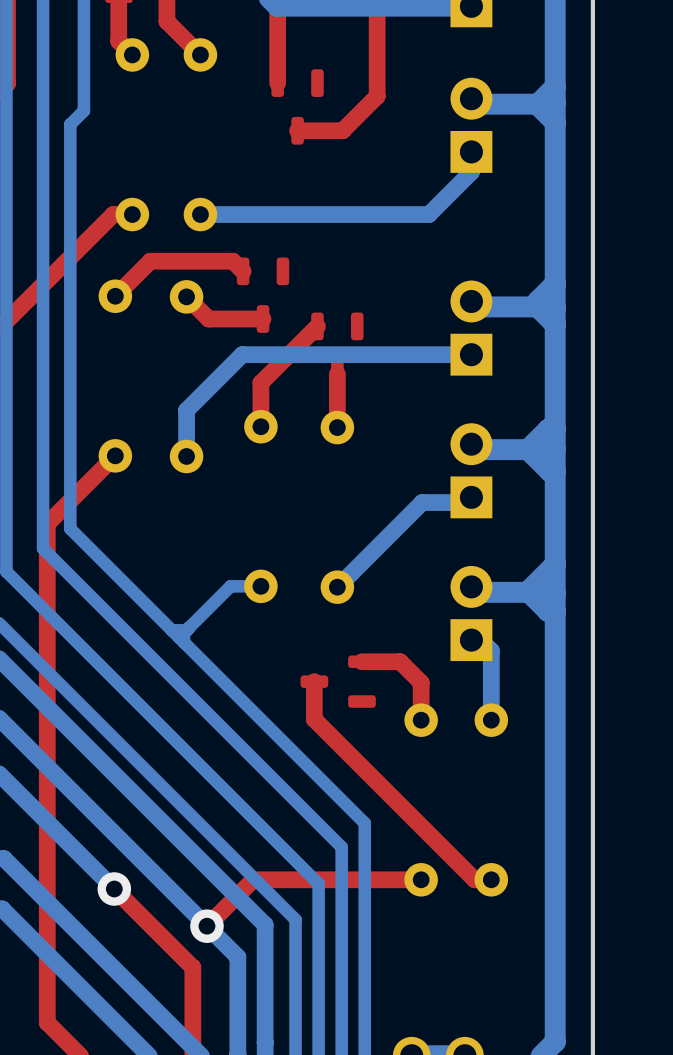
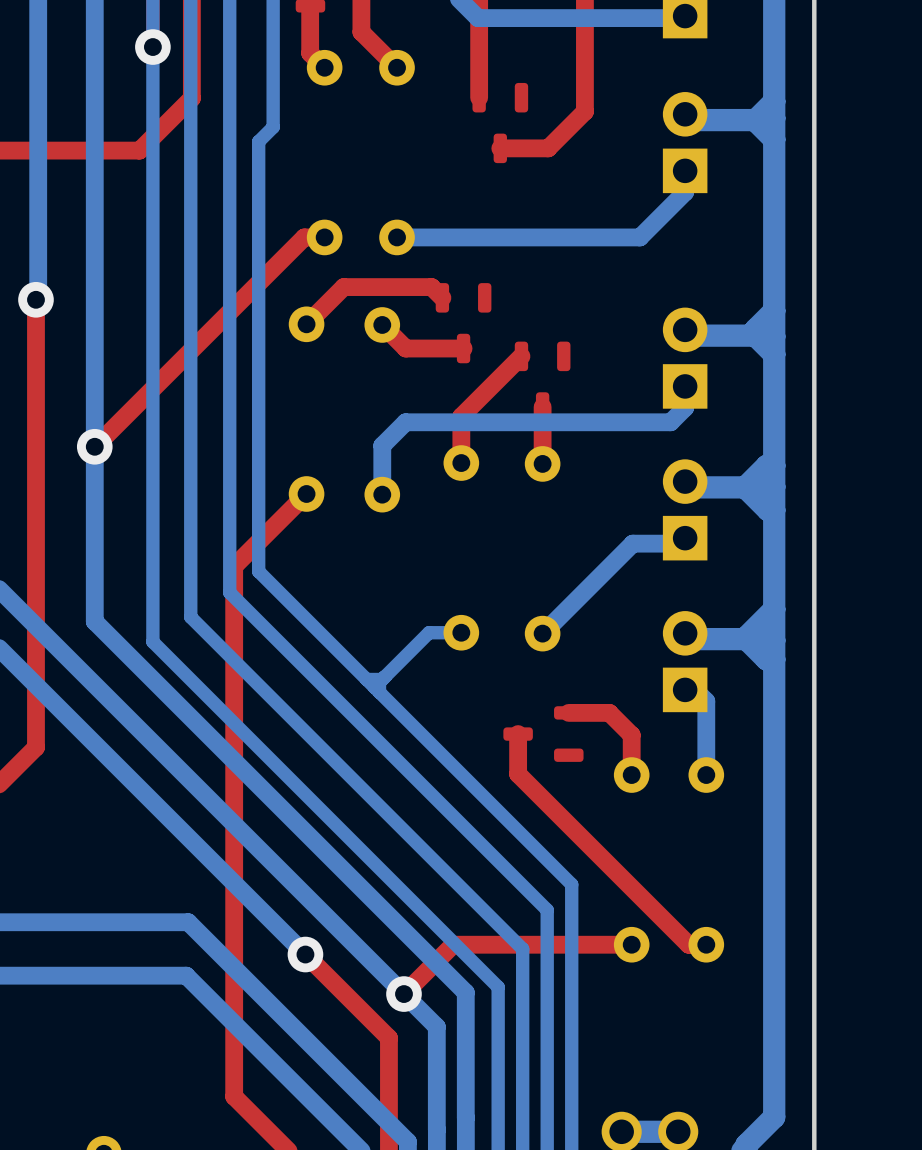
bottom track: (471, 354) (242, 354) (208, 388) -> (685, 386) (685, 407) (670, 422) (405, 422)

